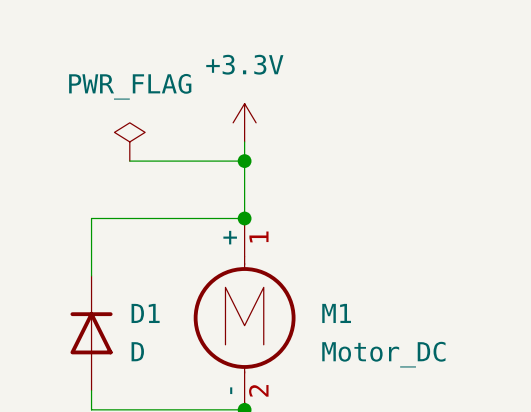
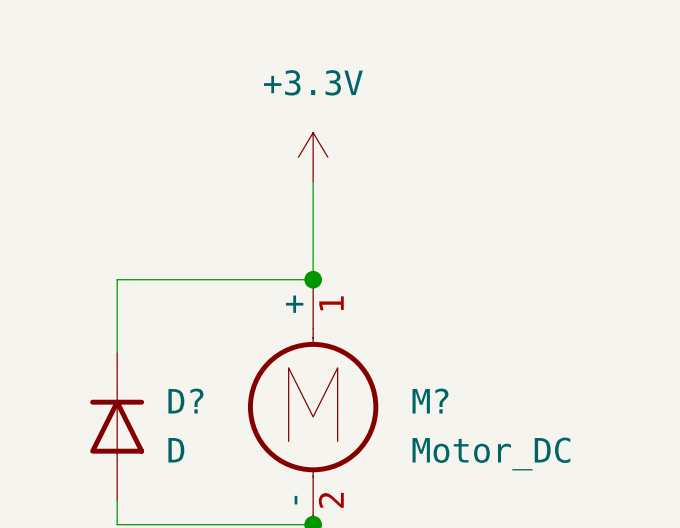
power symbol: PWR_FLAG (129, 141) -> none
wire: (129, 161) (244, 161) -> none
junction: (244, 161) -> none
D1 name: D1 (145, 313) -> D? (185, 401)
M1 name: M1 (336, 313) -> M? (430, 401)

